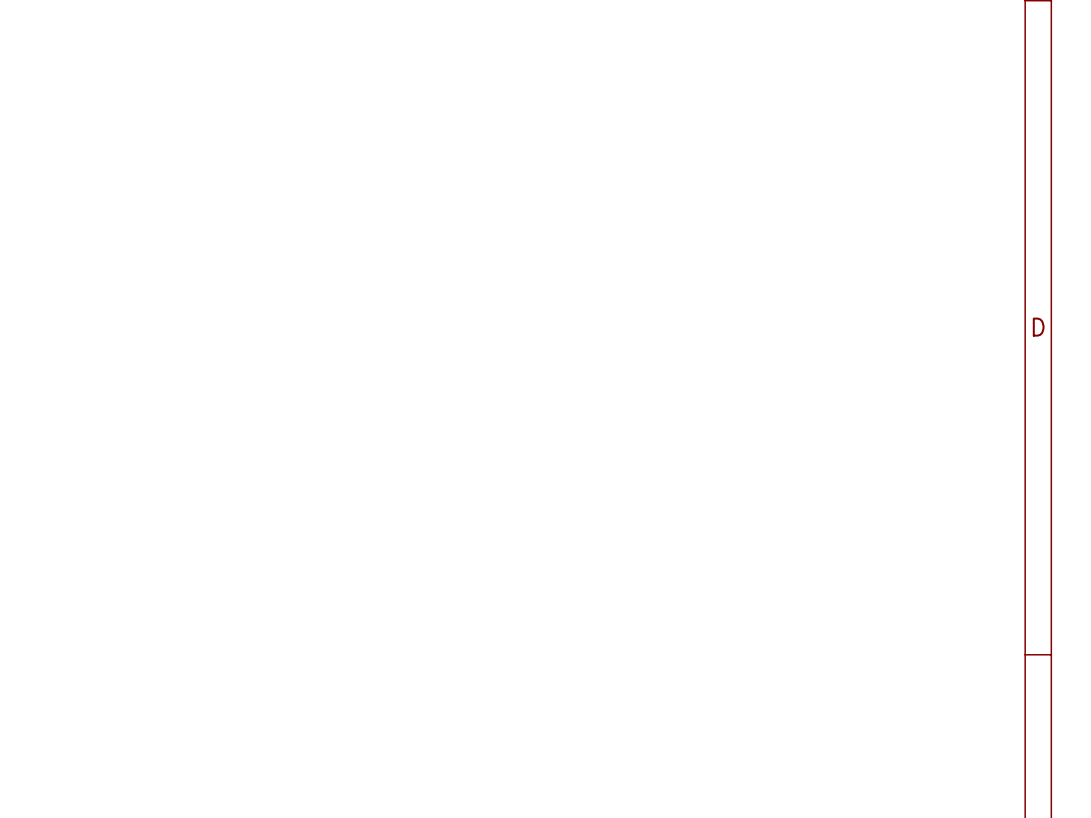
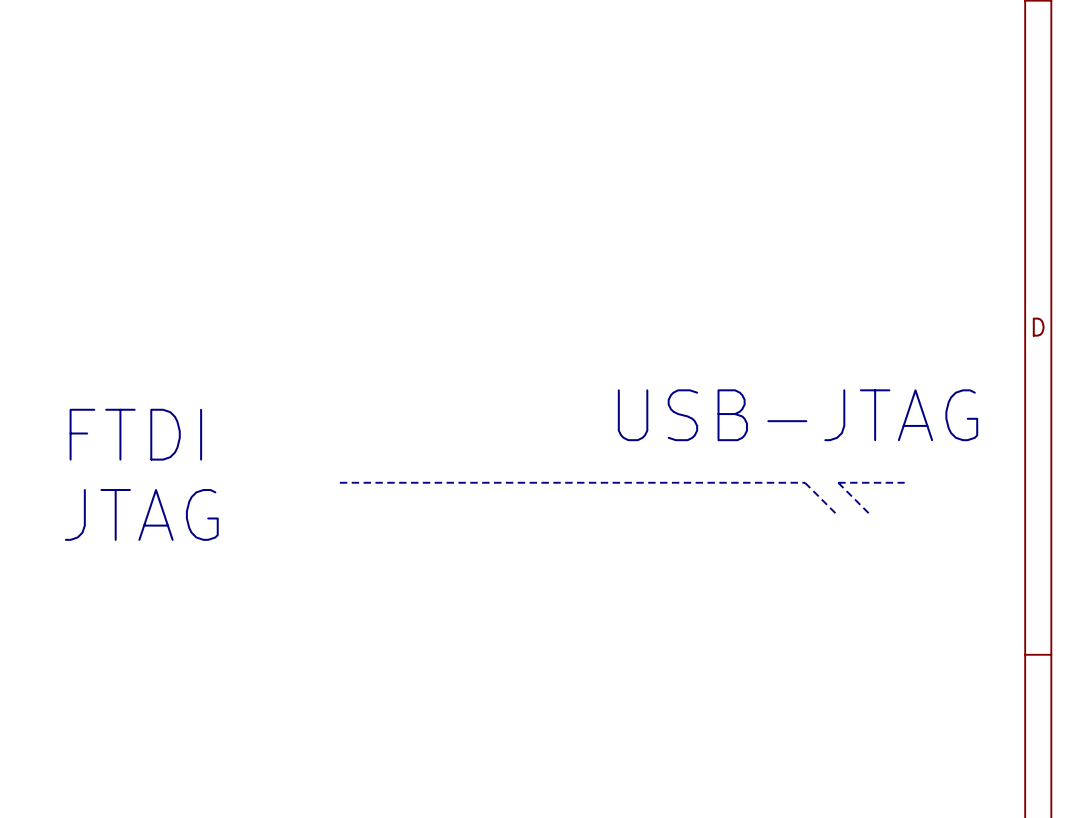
text: none -> USB-JTAG (798, 415)
text: none -> FTDI (135, 434)
line: none -> (339, 482) (805, 482) (838, 515)
line: none -> (904, 482) (838, 482) (871, 515)
text: none -> JTAG (141, 514)

